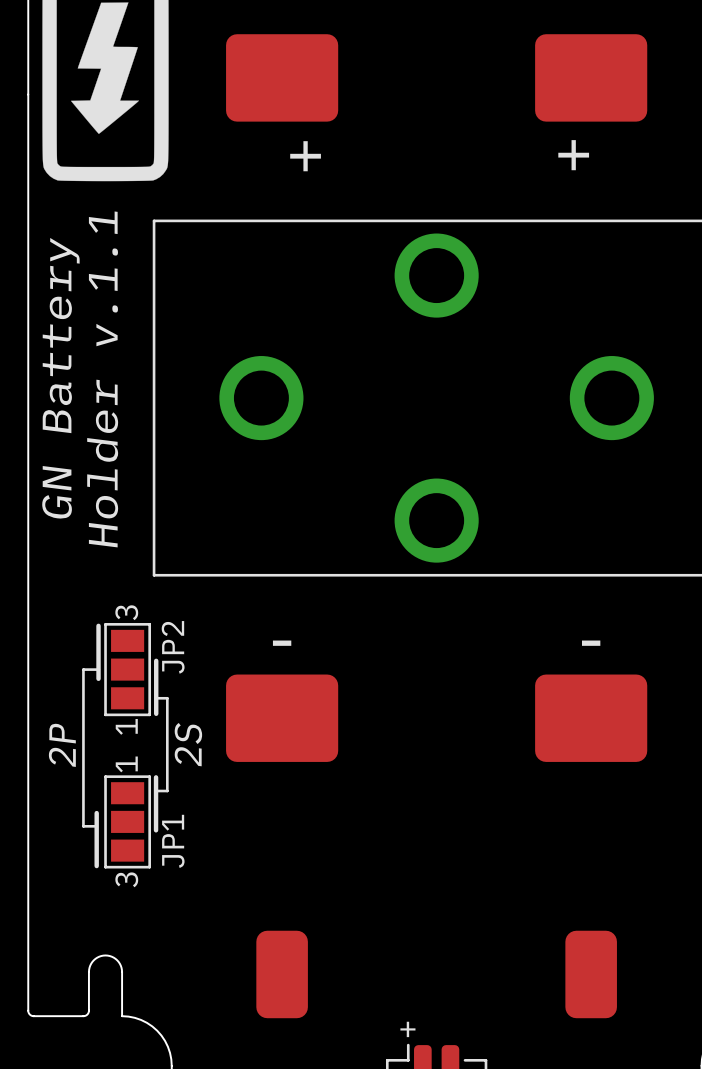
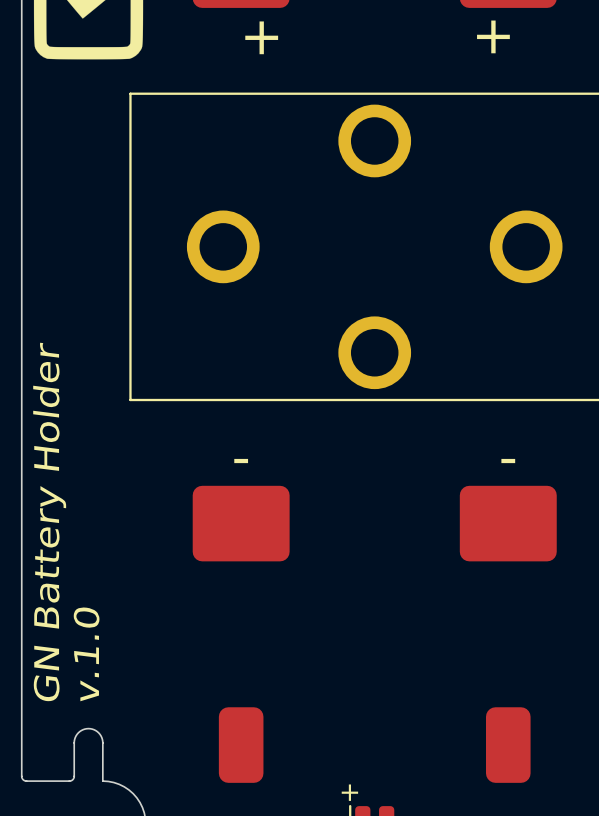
text: GN Battery (60, 378) -> GN Battery Holder (49, 522)
text: Holder v.1.1 (102, 379) -> none
line: (98, 625) (98, 678) -> none
line: (156, 660) (156, 713) -> none
line: (98, 669) (83, 669) (83, 826) (96, 826) -> none
JP2: (127, 669) -> none
line: (156, 698) (167, 698) (167, 791) (156, 791) -> none
text: 2S (188, 744) -> none
text: 2P (62, 745) -> none
line: (156, 777) (156, 830) -> none
line: (96, 813) (96, 866) -> none
JP1: (127, 821) -> none
text: none -> v.1.0 (86, 654)

